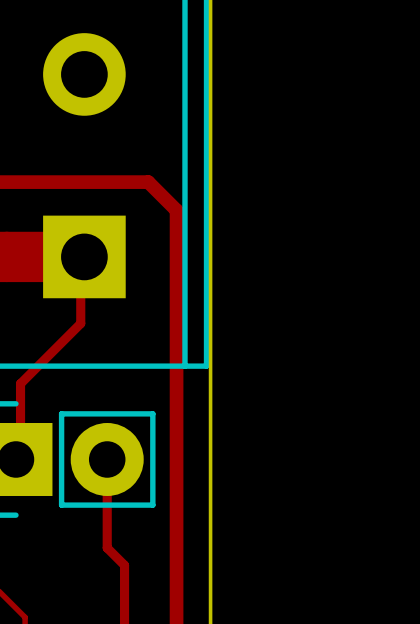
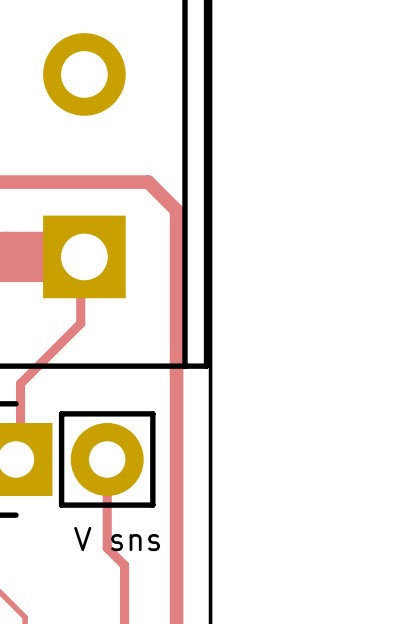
text: none -> V sns (117, 538)

